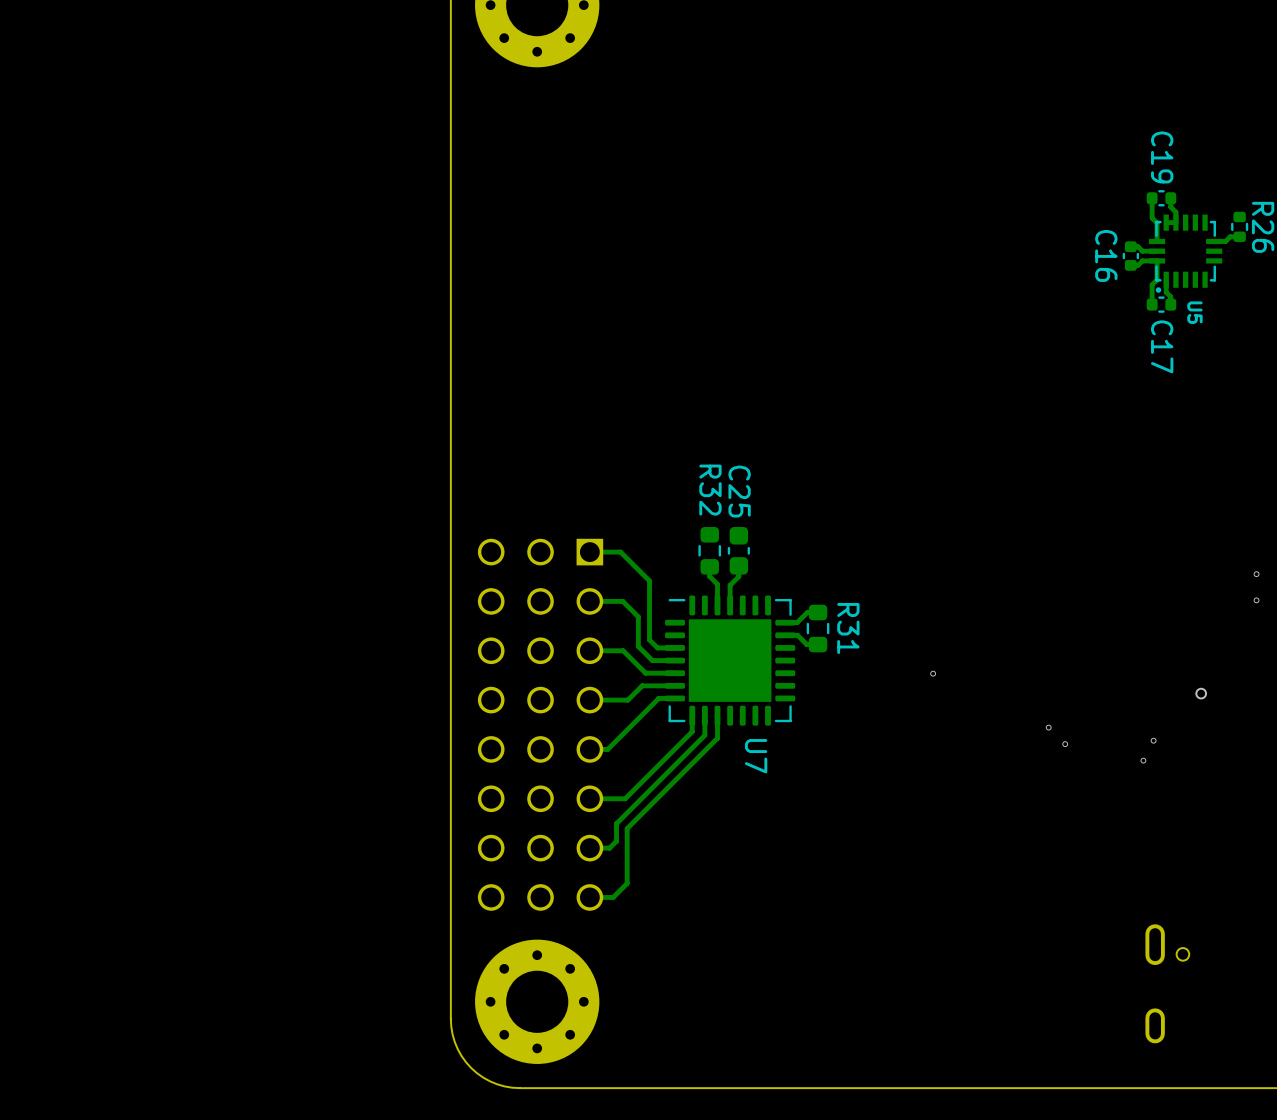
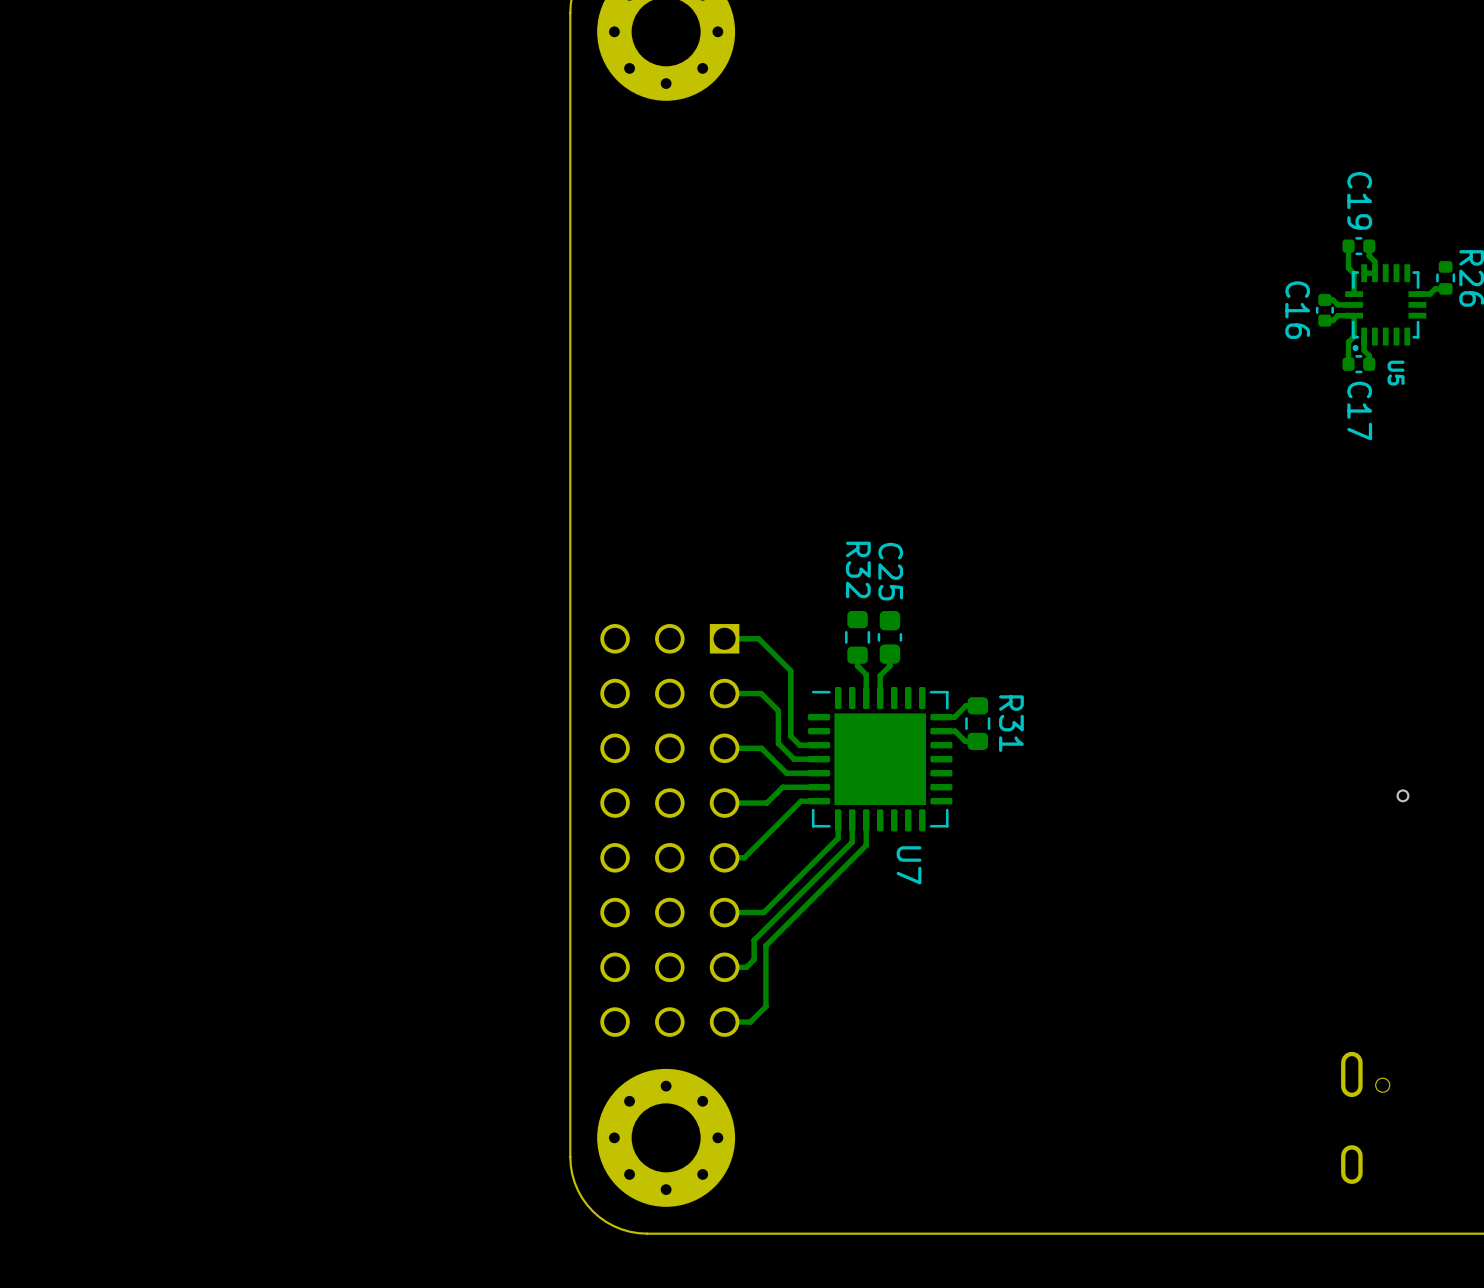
via: (1256, 574) -> none
via: (1256, 600) -> none
via: (933, 673) -> none
via: (1048, 727) -> none
via: (1153, 740) -> none
via: (1065, 744) -> none
via: (1143, 760) -> none

